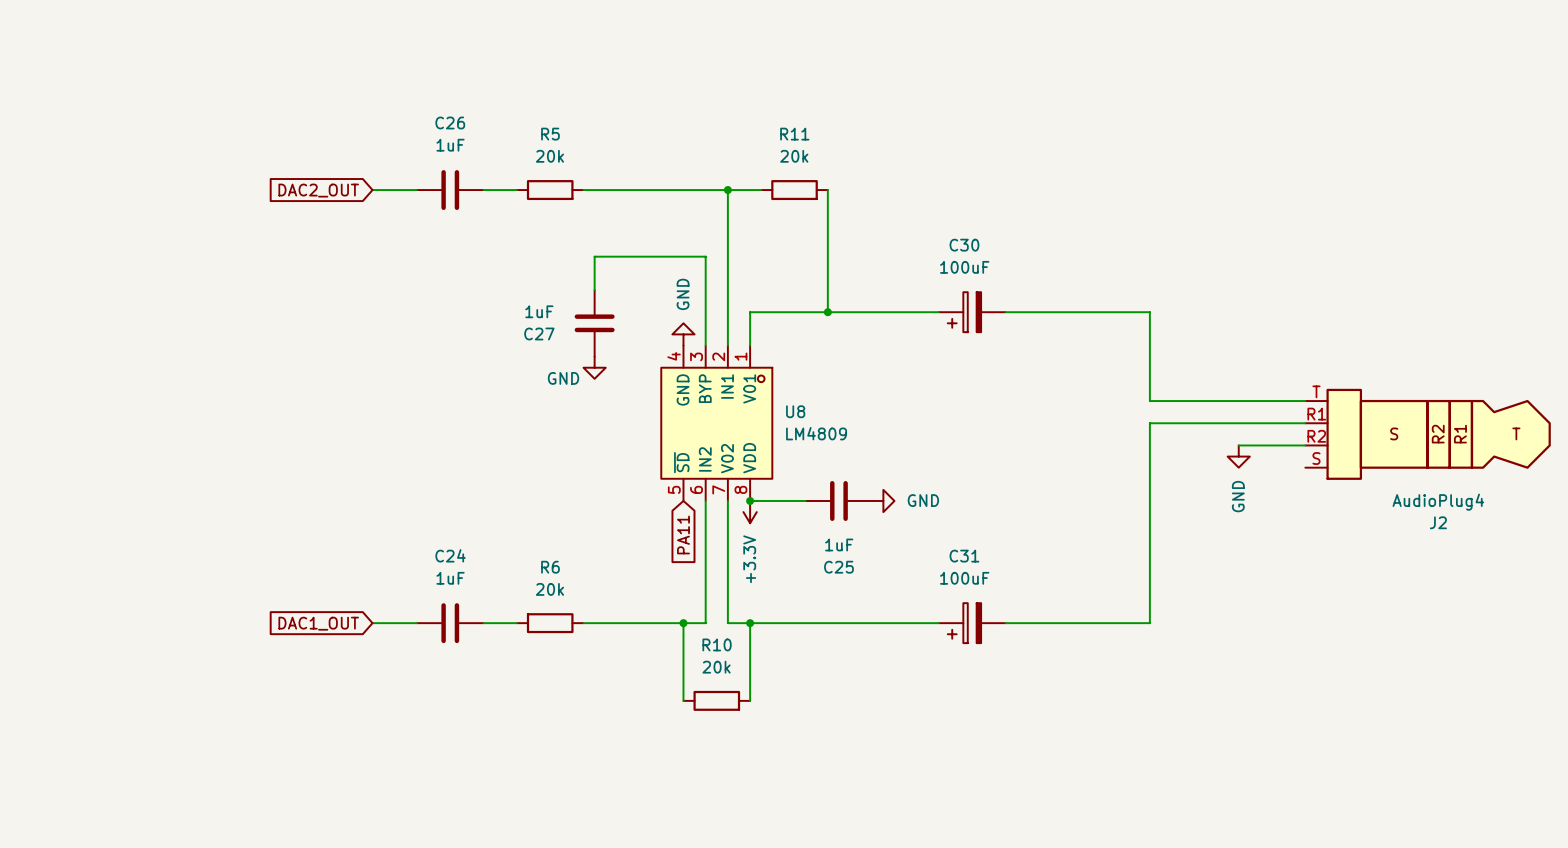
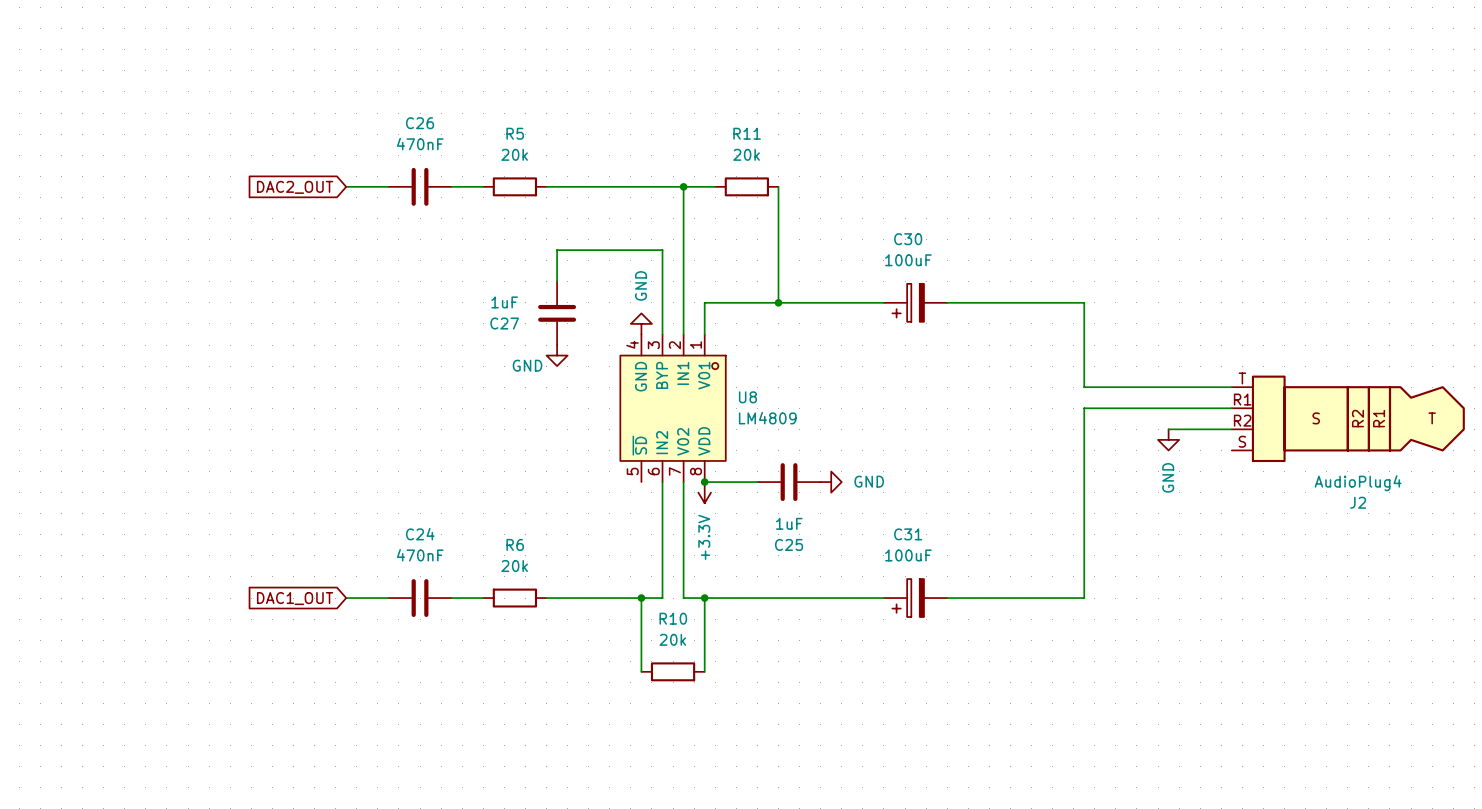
C26 value: 1uF (450, 145) -> 470nF (420, 144)
global label: PA11 (683, 534) -> none
C24 value: 1uF (450, 578) -> 470nF (420, 555)

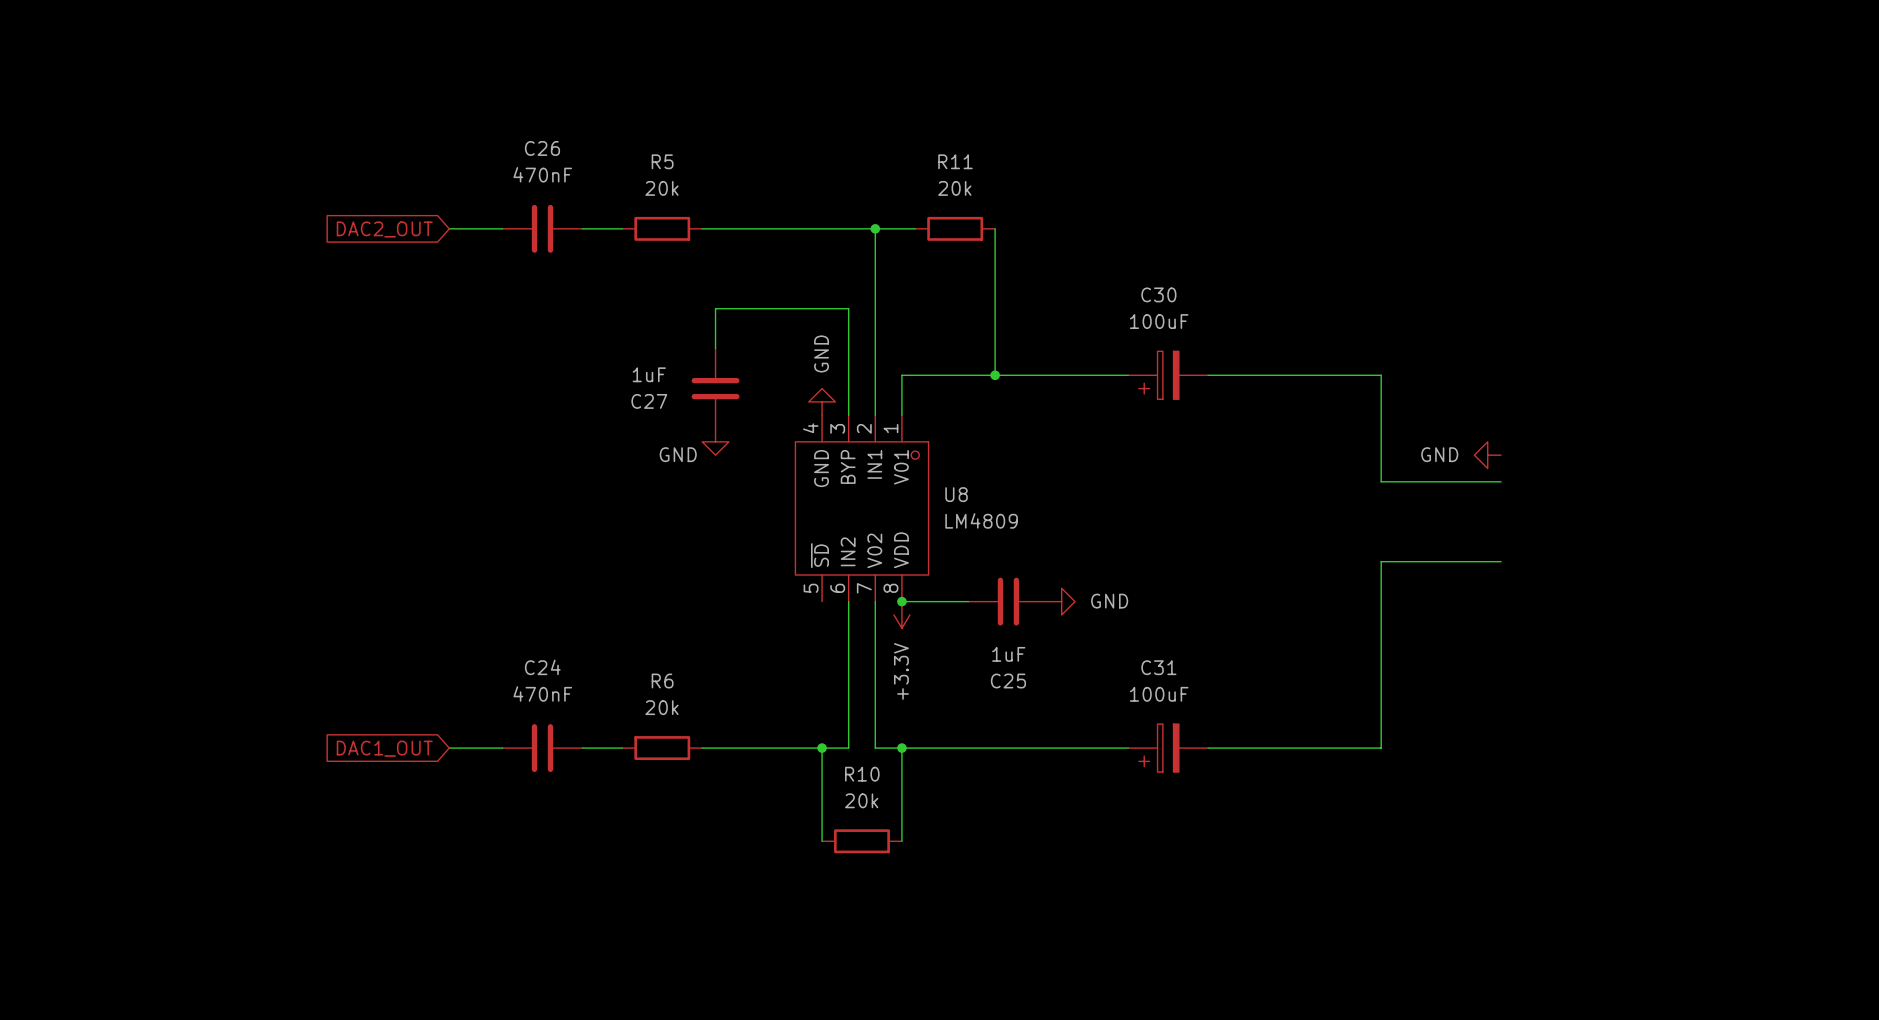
wire: (1179, 387) (1231, 387) -> none
wire: (1231, 408) (1084, 408) (1084, 450) -> (1501, 561) (1381, 561)
J2: AudioPlug4 (1348, 418) -> none
wire: (1168, 429) (1231, 429) -> none
power symbol rotation: 0° (1168, 439) -> 90° clockwise (1487, 455)
power symbol position: GND (1168, 439) -> GND (1487, 455)

